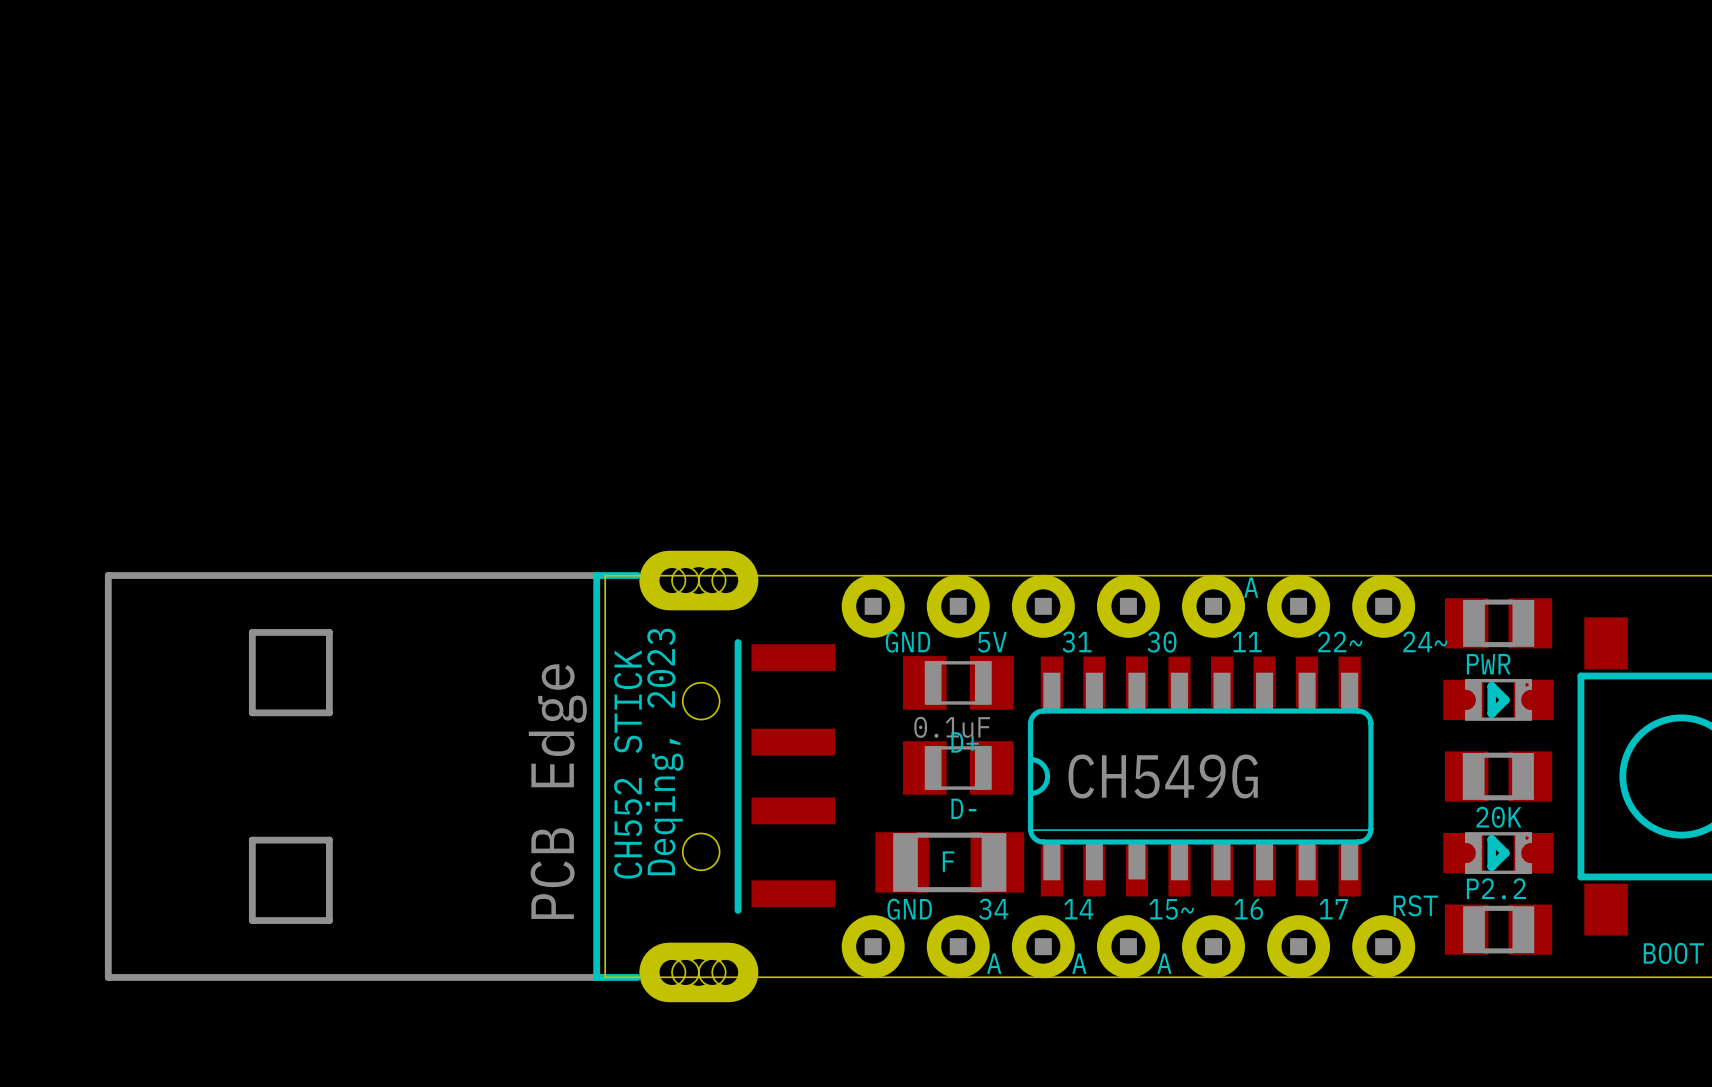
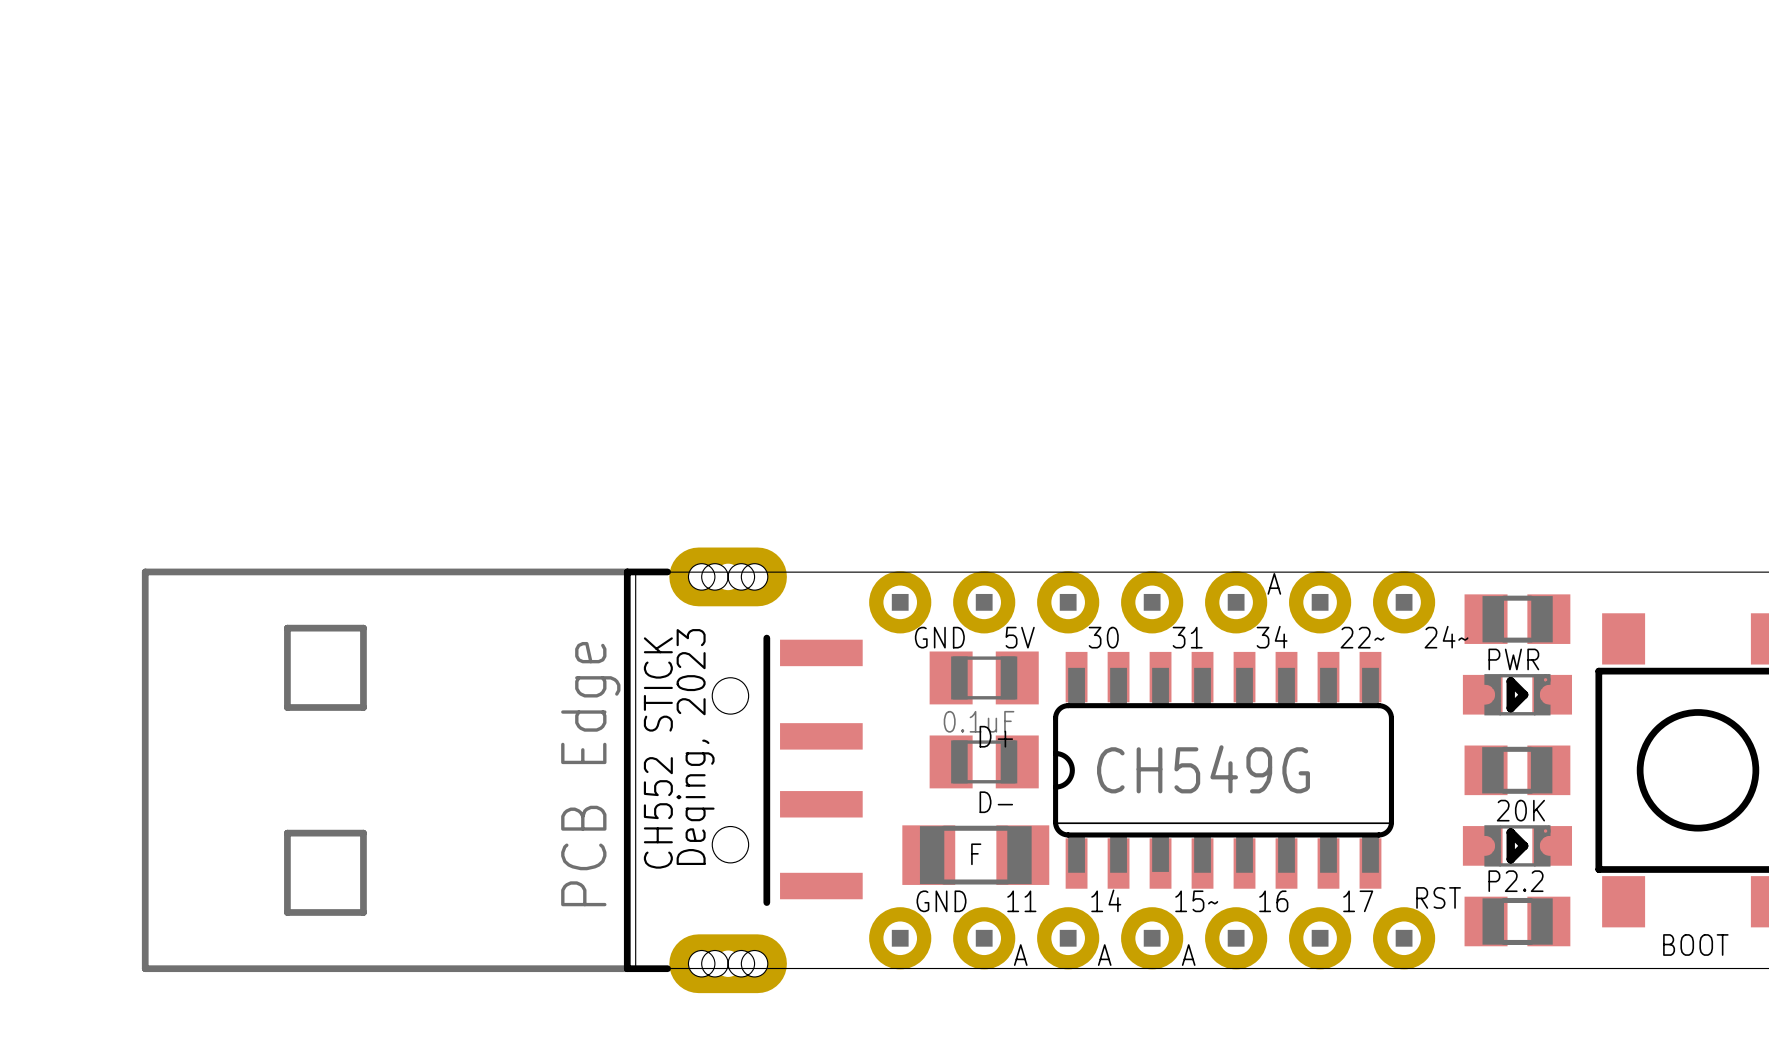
text: 31 (1077, 642) -> 30 (1103, 637)
text: 30 (1161, 642) -> 31 (1187, 637)
text: 11 (1247, 642) -> 34 (1272, 637)
text: 34 (993, 909) -> 11 (1021, 901)

